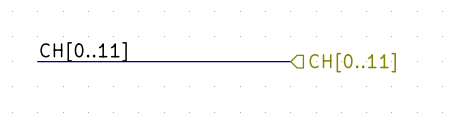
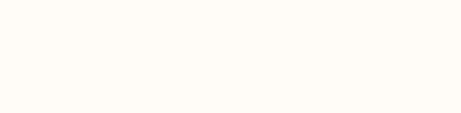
label: CH[0..11] (83, 51) -> none
bus: (37, 61) (290, 61) -> none
hierarchical label: CH[0..11] (352, 62) -> none

